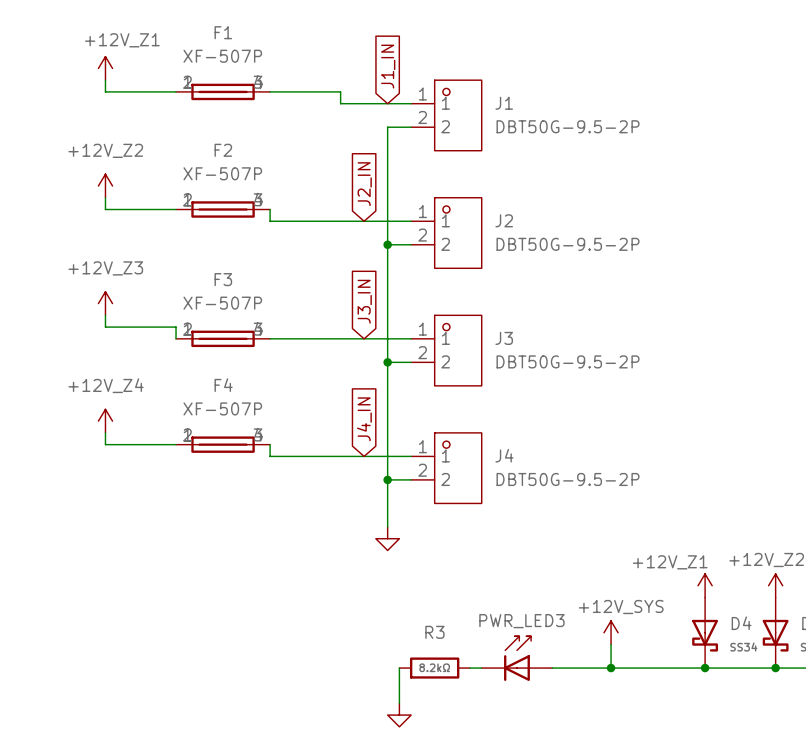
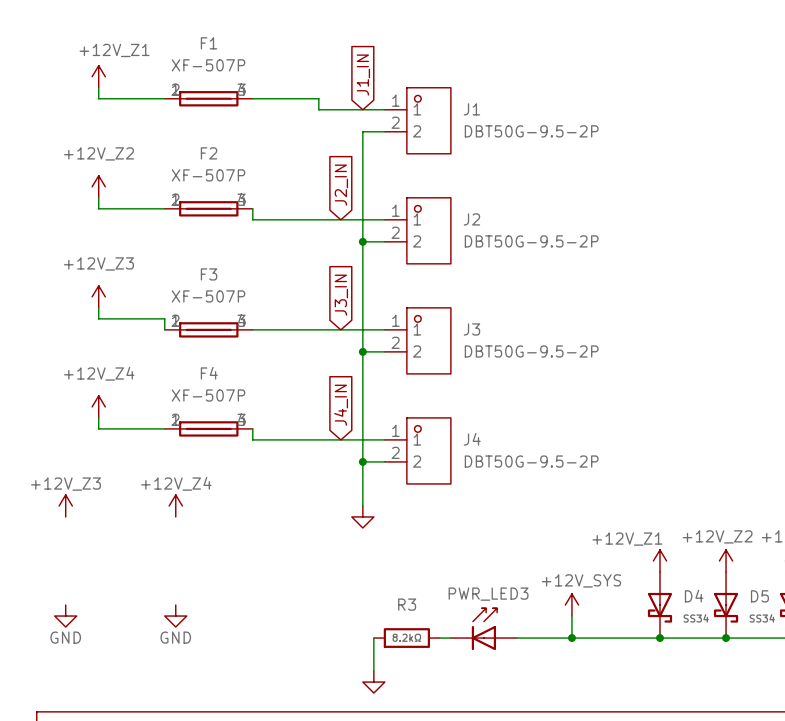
power symbol: none -> +12V_Z3 (65, 505)
power symbol: none -> +12V_Z4 (175, 505)
power symbol: none -> GND (65, 616)
power symbol: none -> GND (175, 616)

